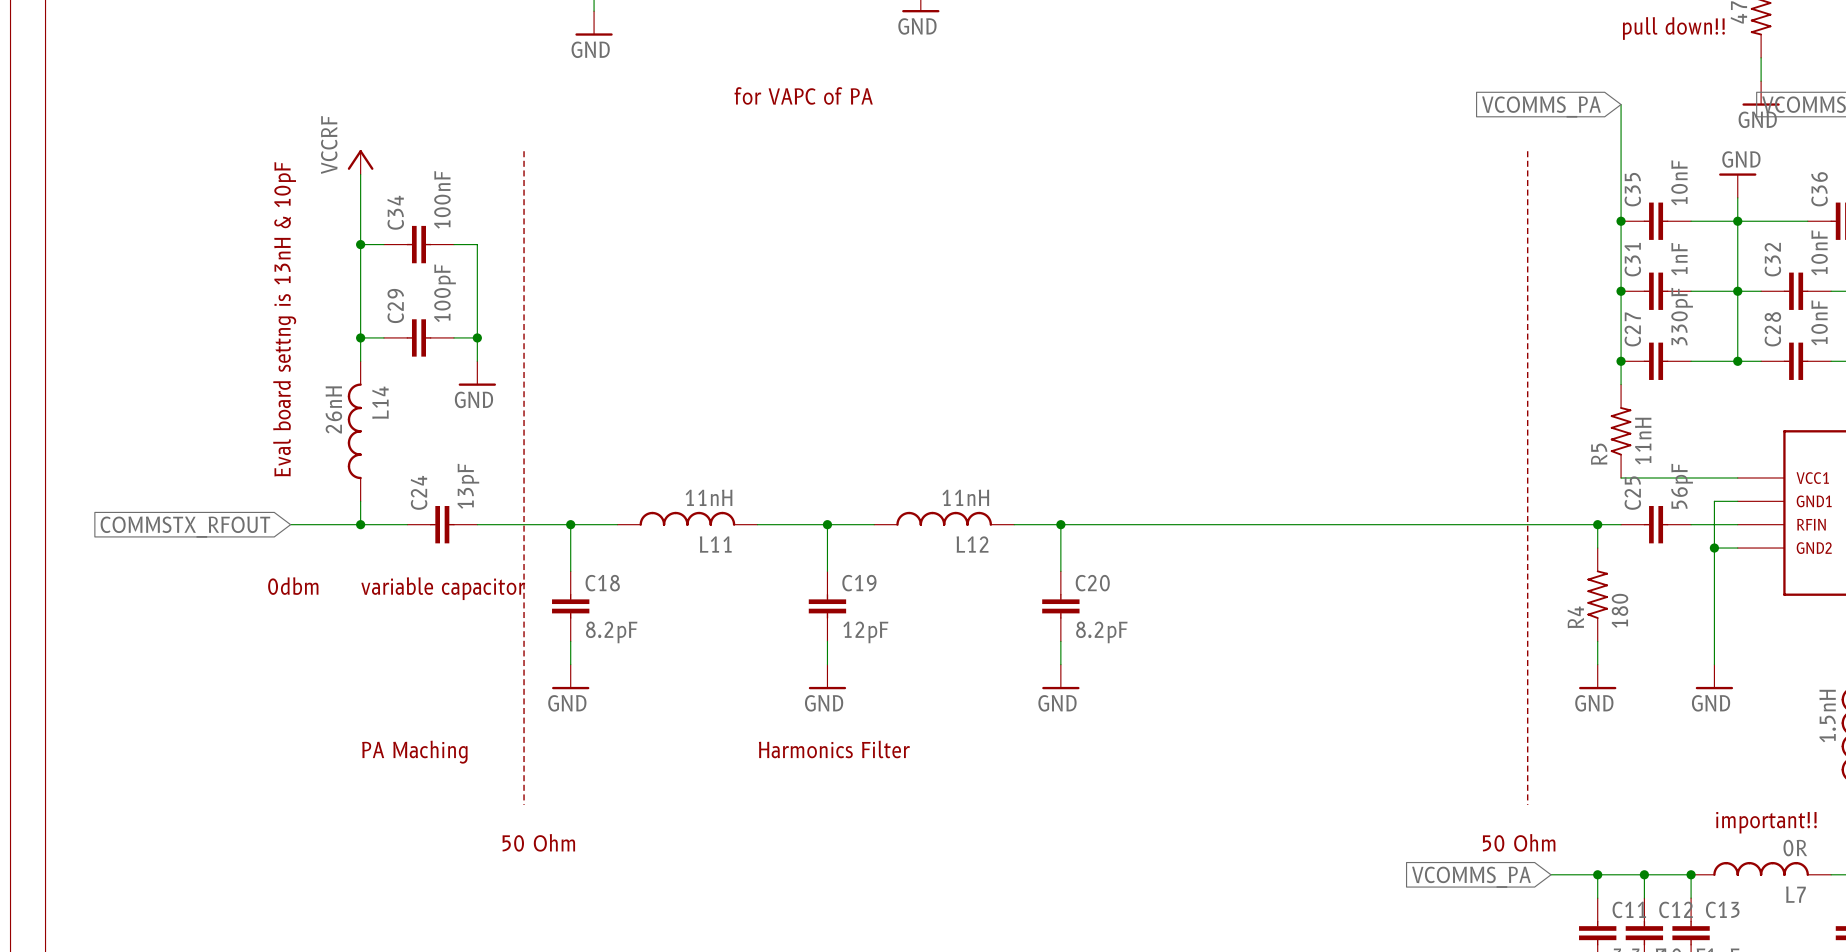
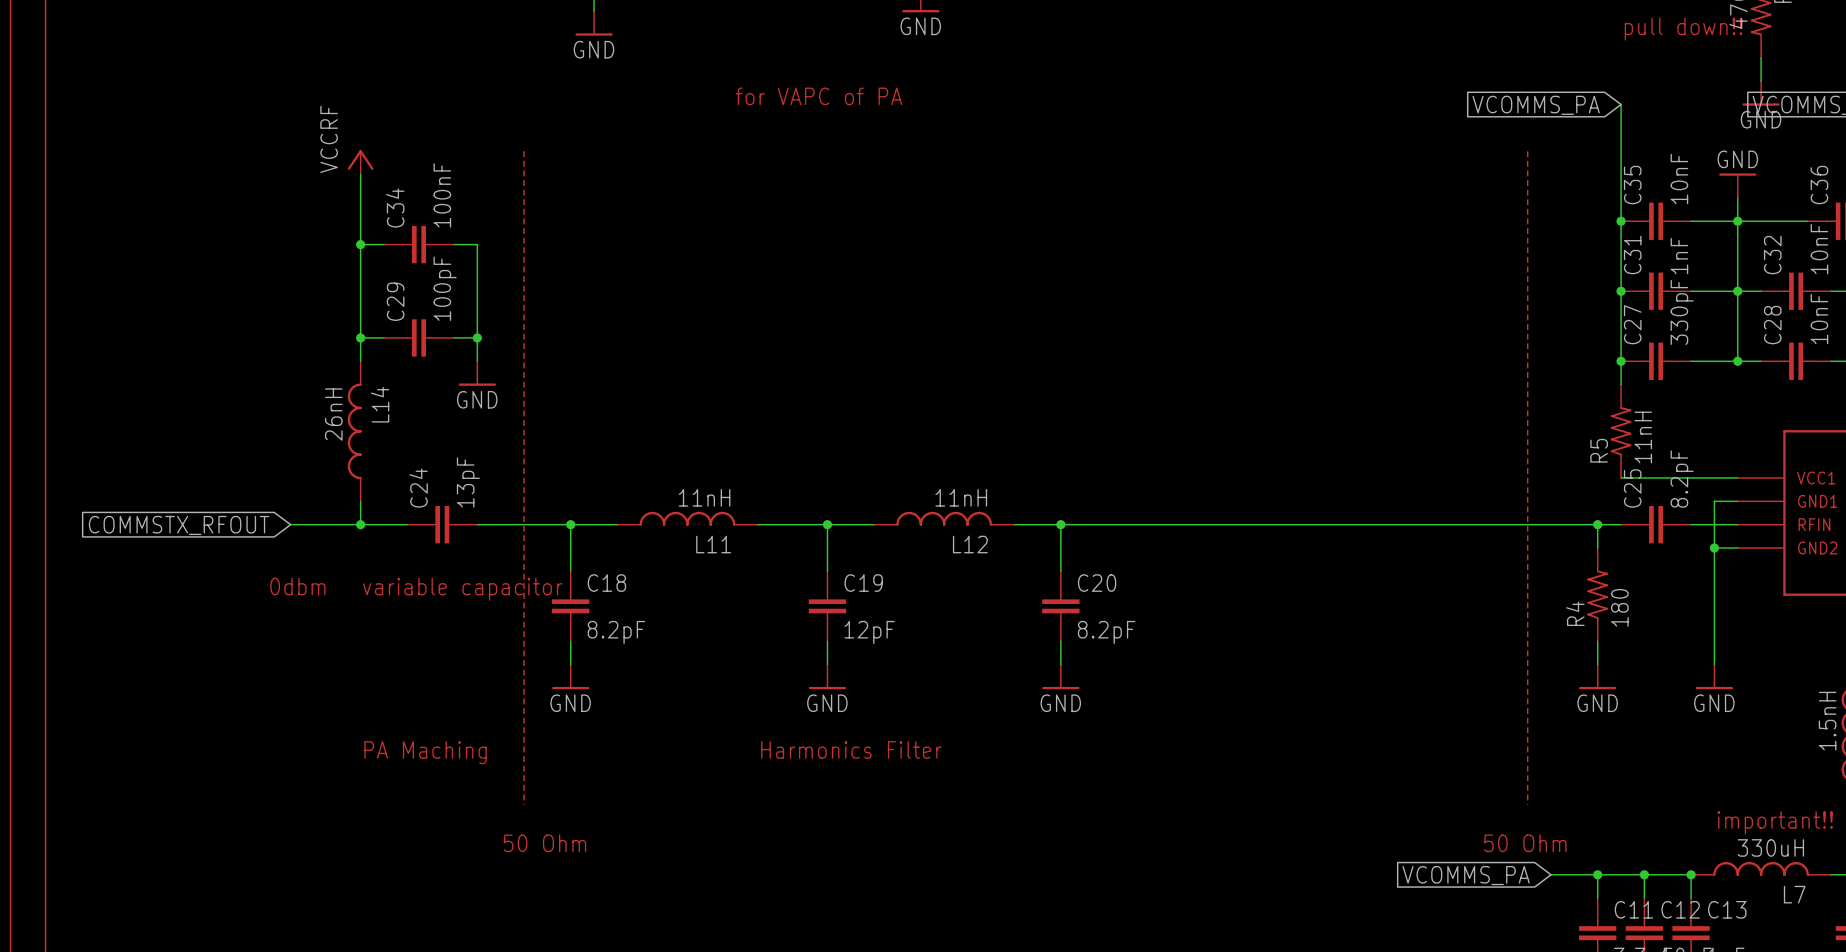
text: Eval board settng is 13nH & 10pF (284, 319) -> none
C25 value: 56pF (1682, 486) -> 8.2pF (1682, 479)
L7 value: 0R (1795, 848) -> 330uH (1770, 847)

